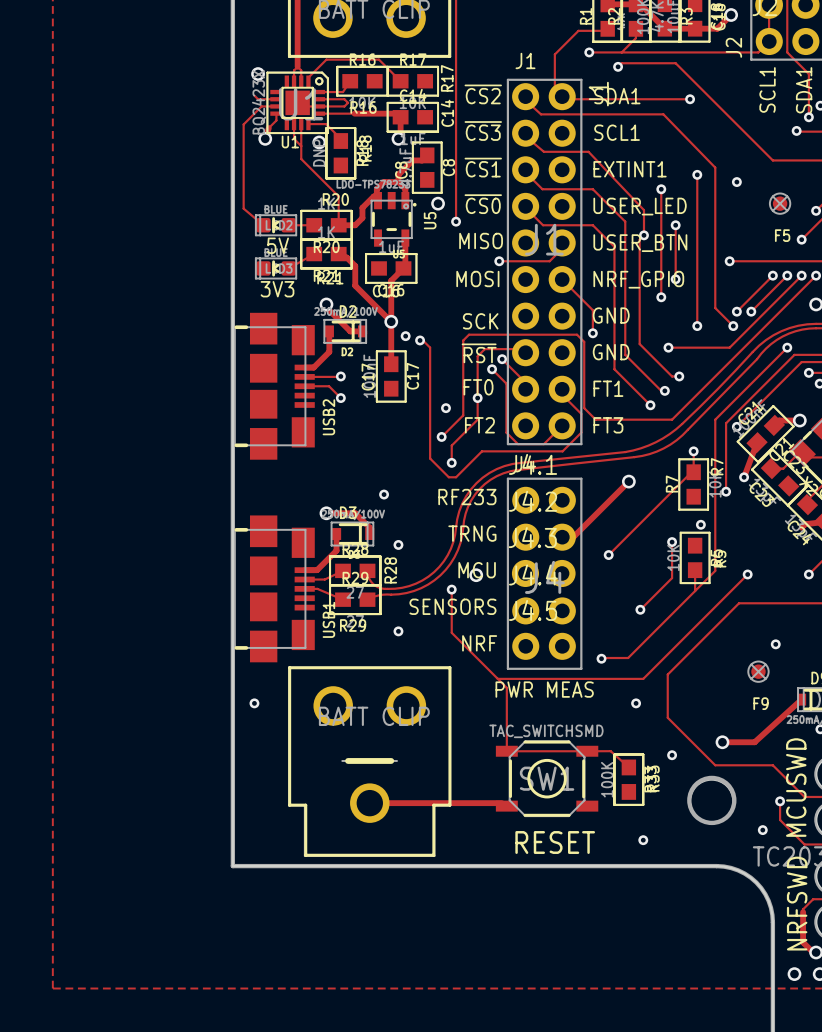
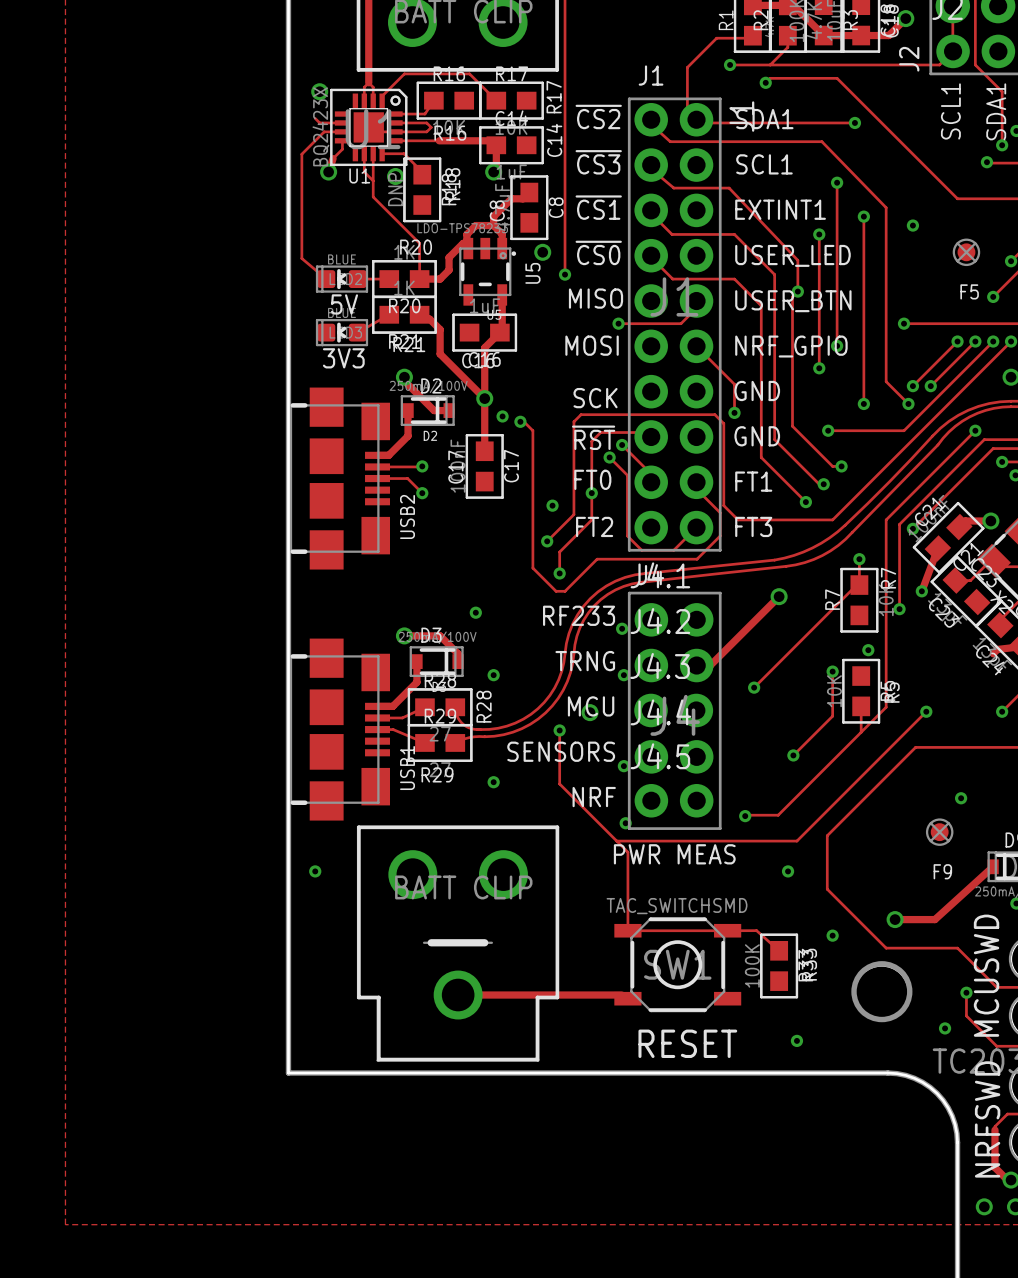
track: none -> (837, 182) (837, 279)
via position: (675, 225) -> (837, 182)
via: none -> (622, 628)
via: none -> (623, 675)
via: none -> (623, 766)
via: none -> (625, 823)

